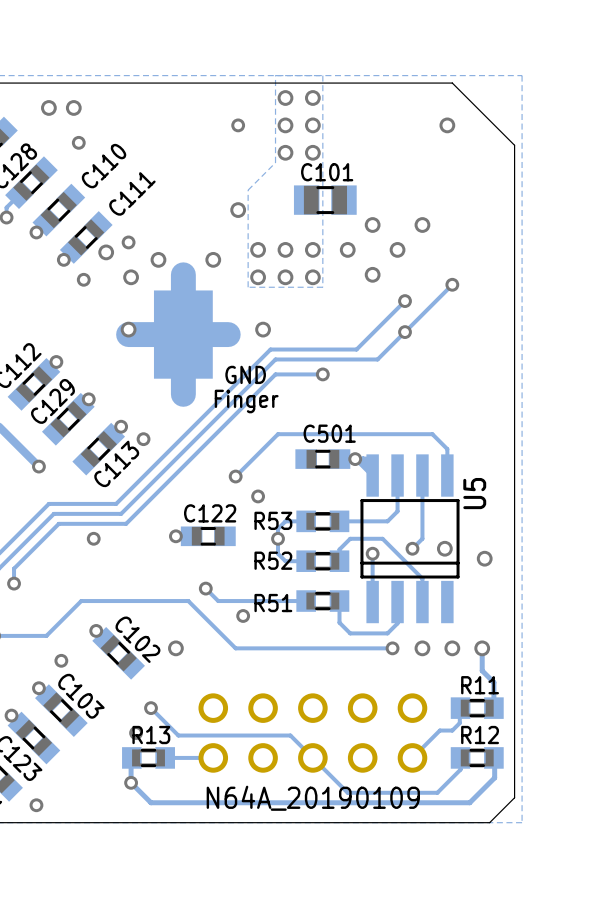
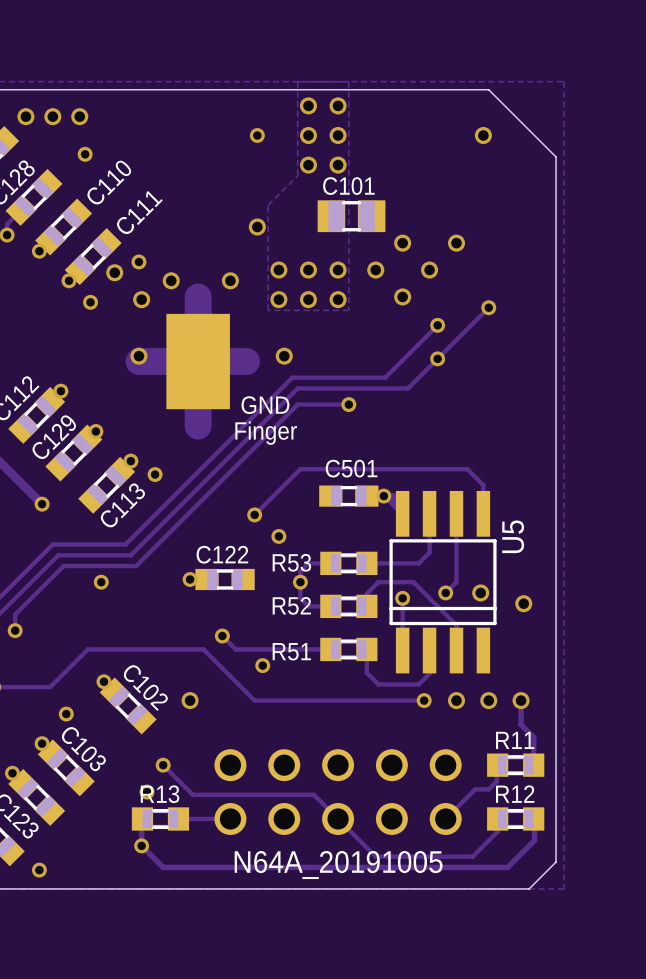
via: none -> (25, 116)
text: N64A_20190109 (313, 798) -> N64A_20191005 (338, 864)

